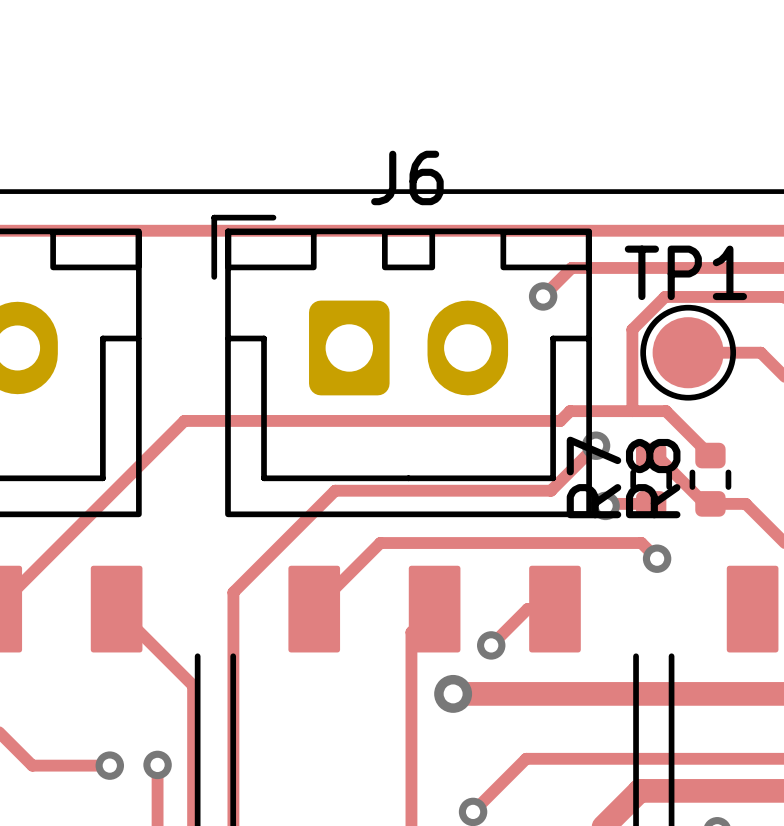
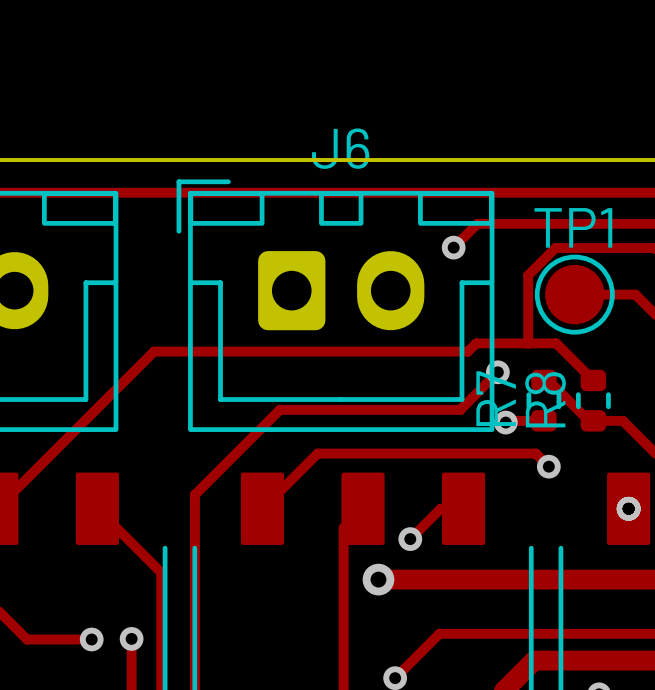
via: none -> (628, 508)

